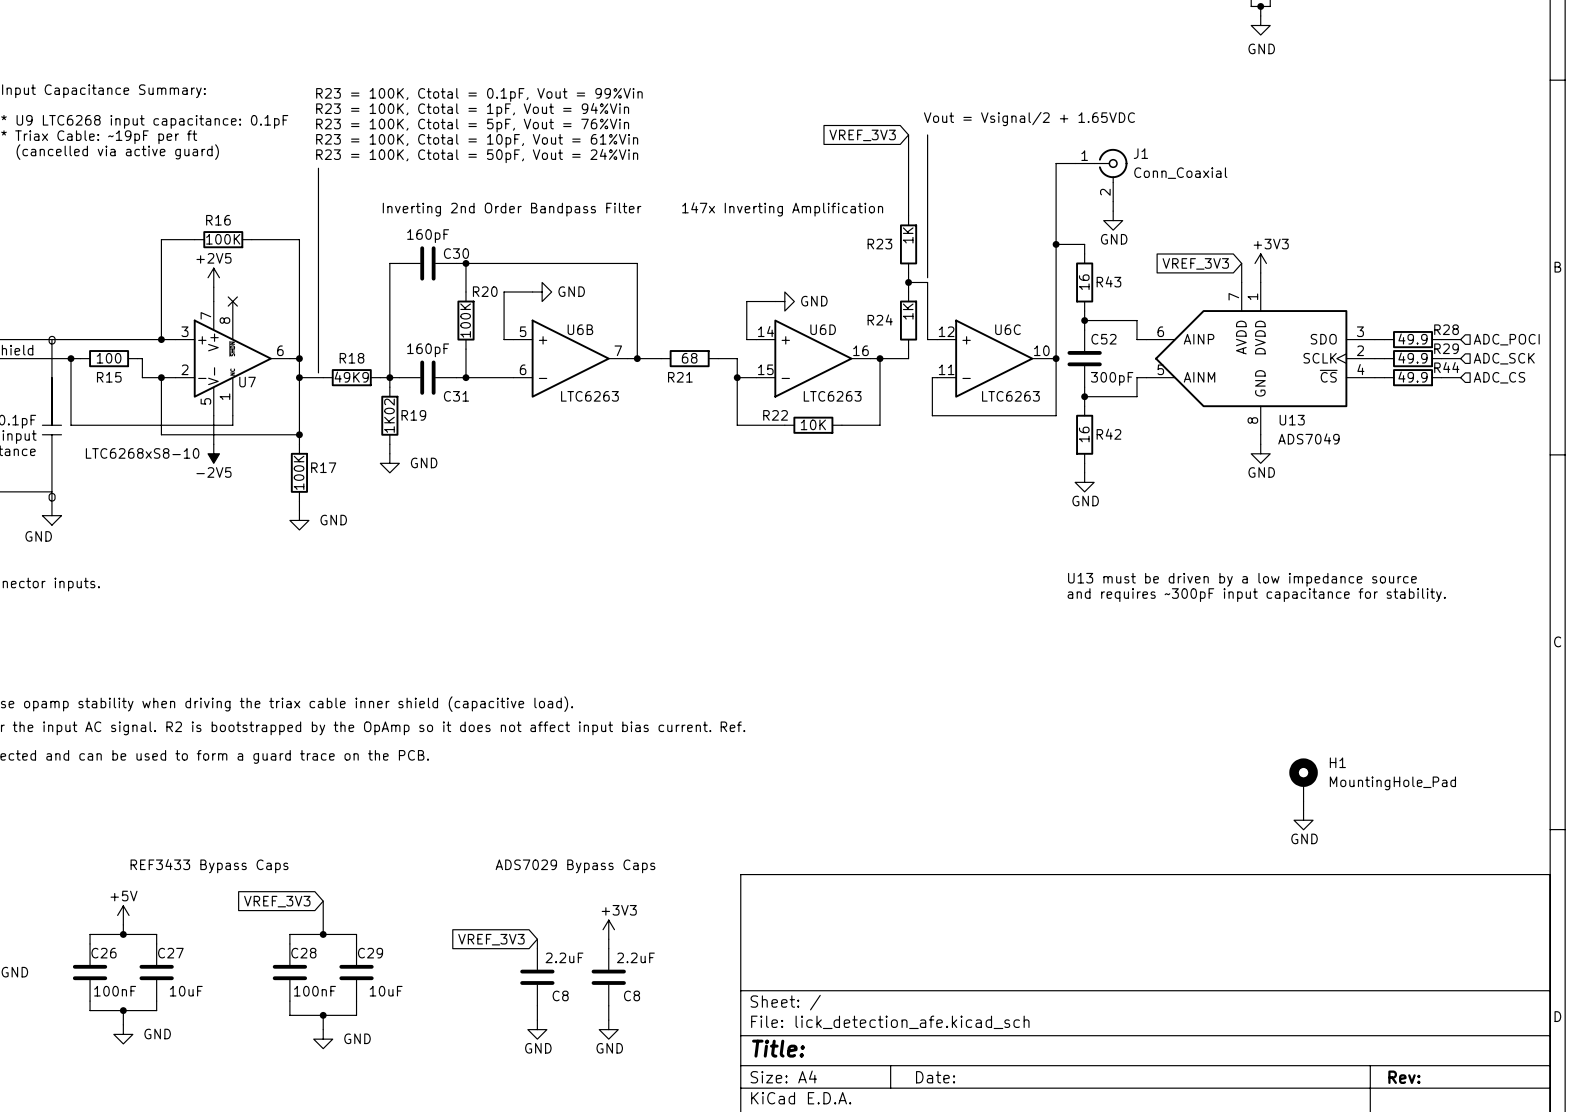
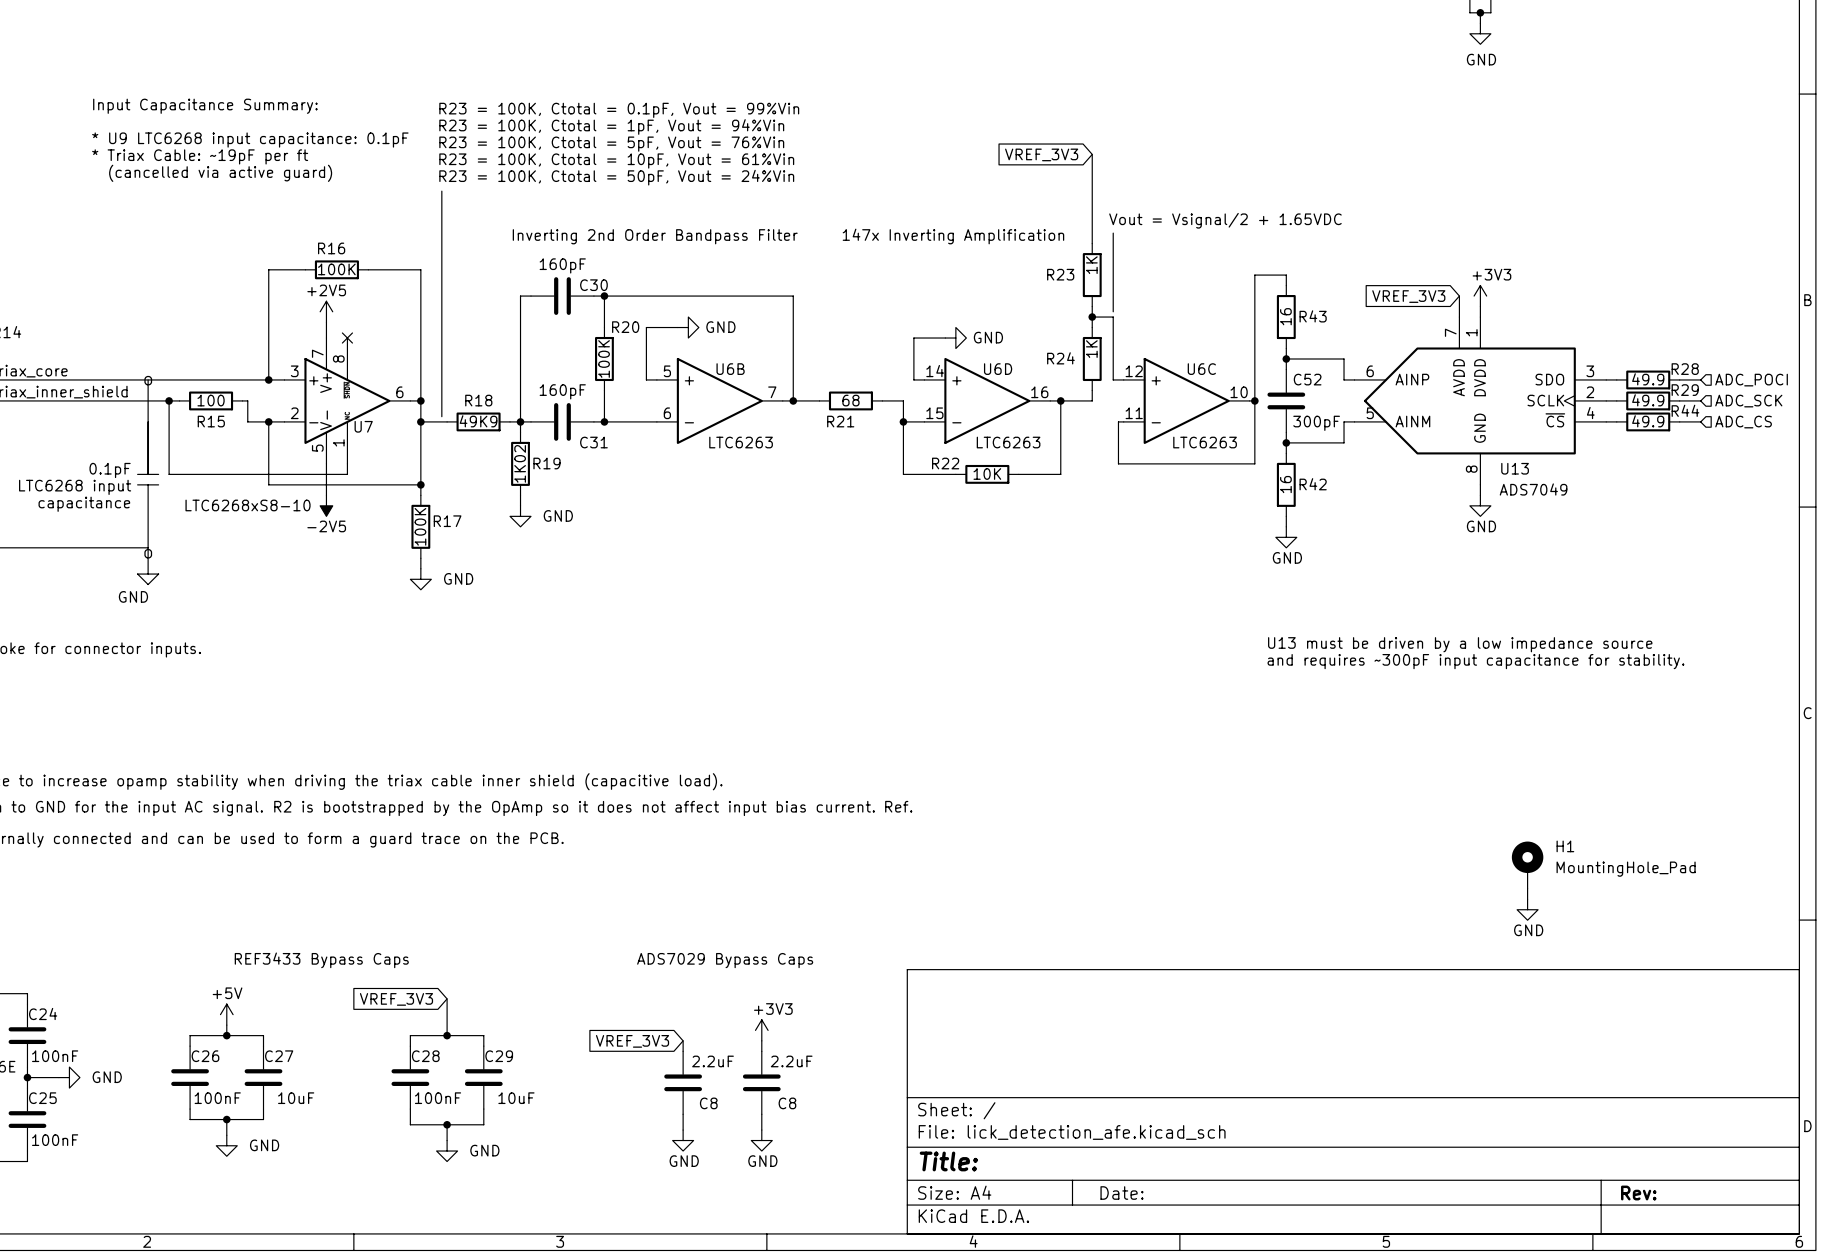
text position: Vout = Vsignal/2 + 1.65VDC (1029, 119) -> Vout = Vsignal/2 + 1.65VDC (1225, 220)
line: (927, 134) (927, 206) -> none
wire: (1075, 163) (1056, 163) (1056, 244) -> none
J1: Conn_Coaxial (1101, 175) -> none
wire: (1113, 201) (1113, 211) -> none
power symbol: GND (1113, 220) -> none
junction: (1056, 244) -> none

